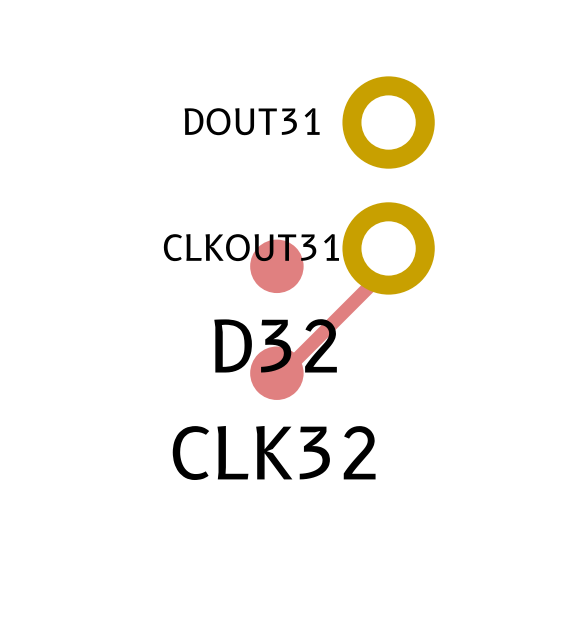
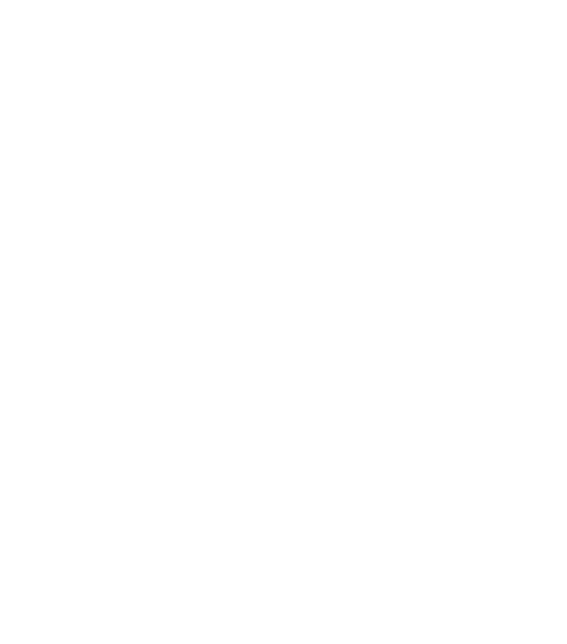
DOUT31: (388, 122) -> none
track: (388, 248) (388, 267) (276, 379) -> none
CLKOUT31: (388, 248) -> none
D32: (276, 266) -> none
CLK32: (276, 373) -> none

